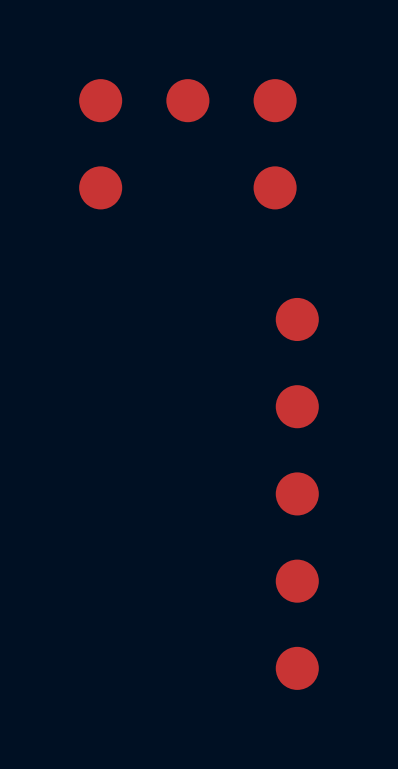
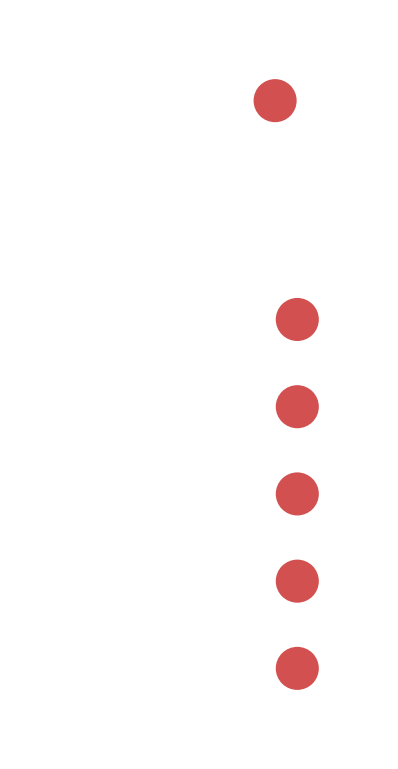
part: (100, 100) -> none
part: (187, 100) -> none
part: (100, 187) -> none
part: (275, 187) -> none

